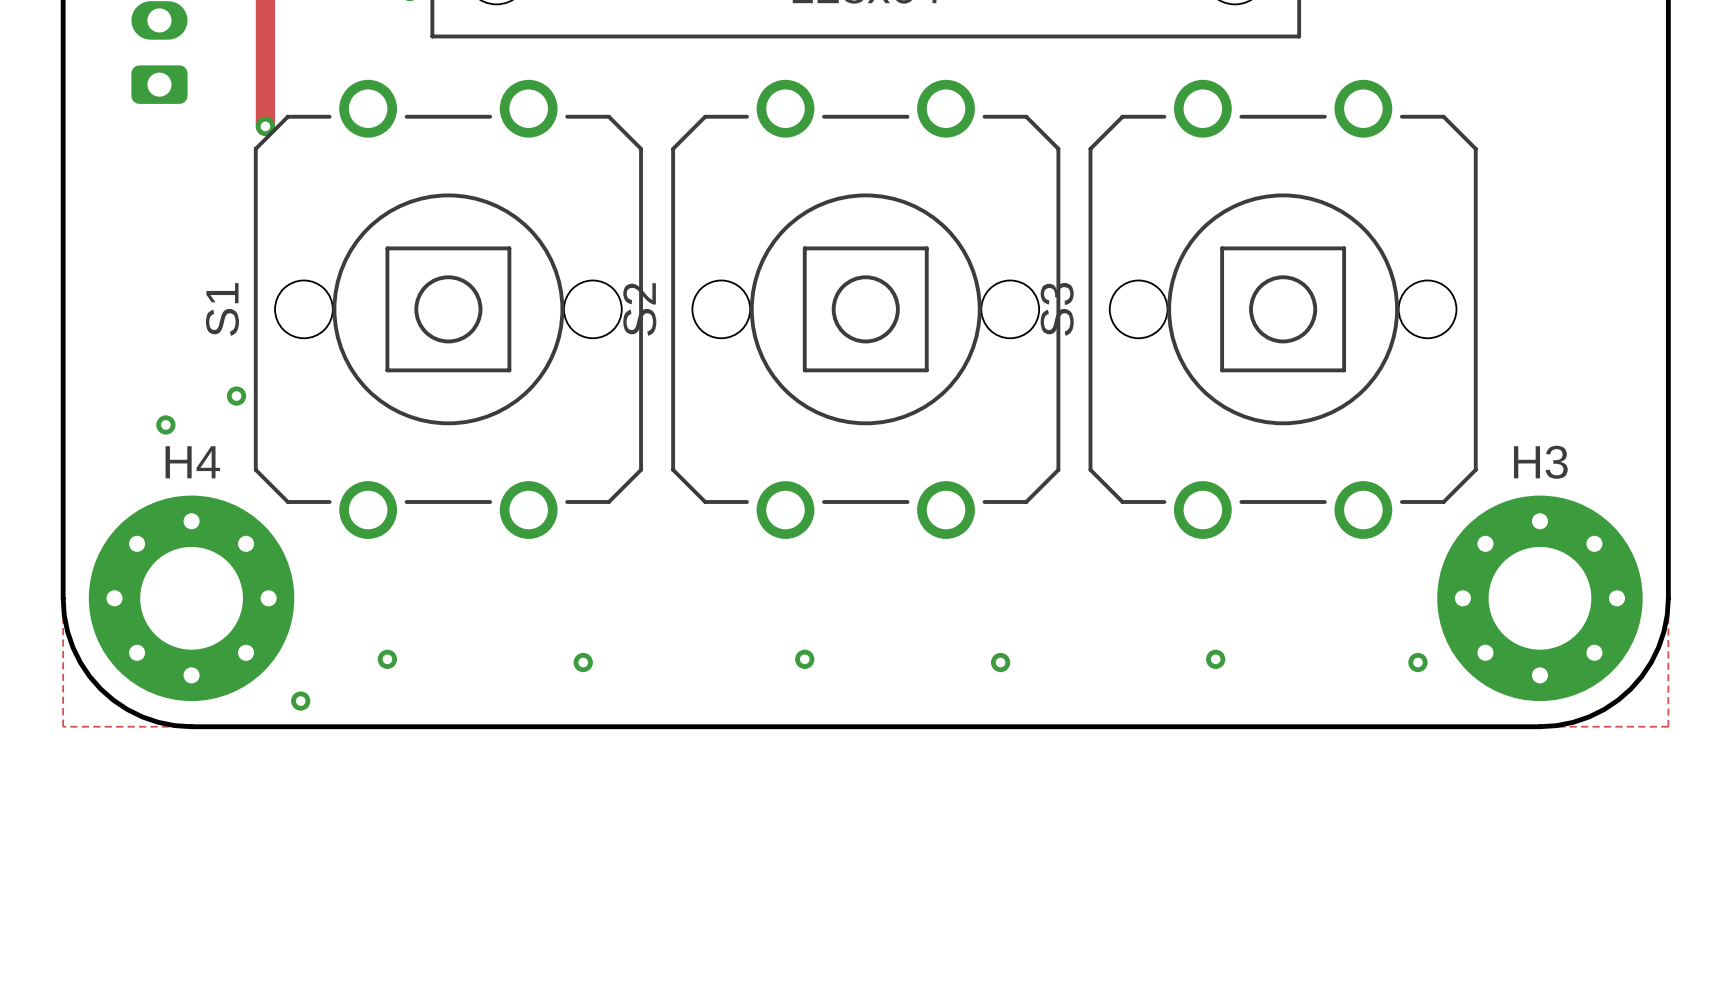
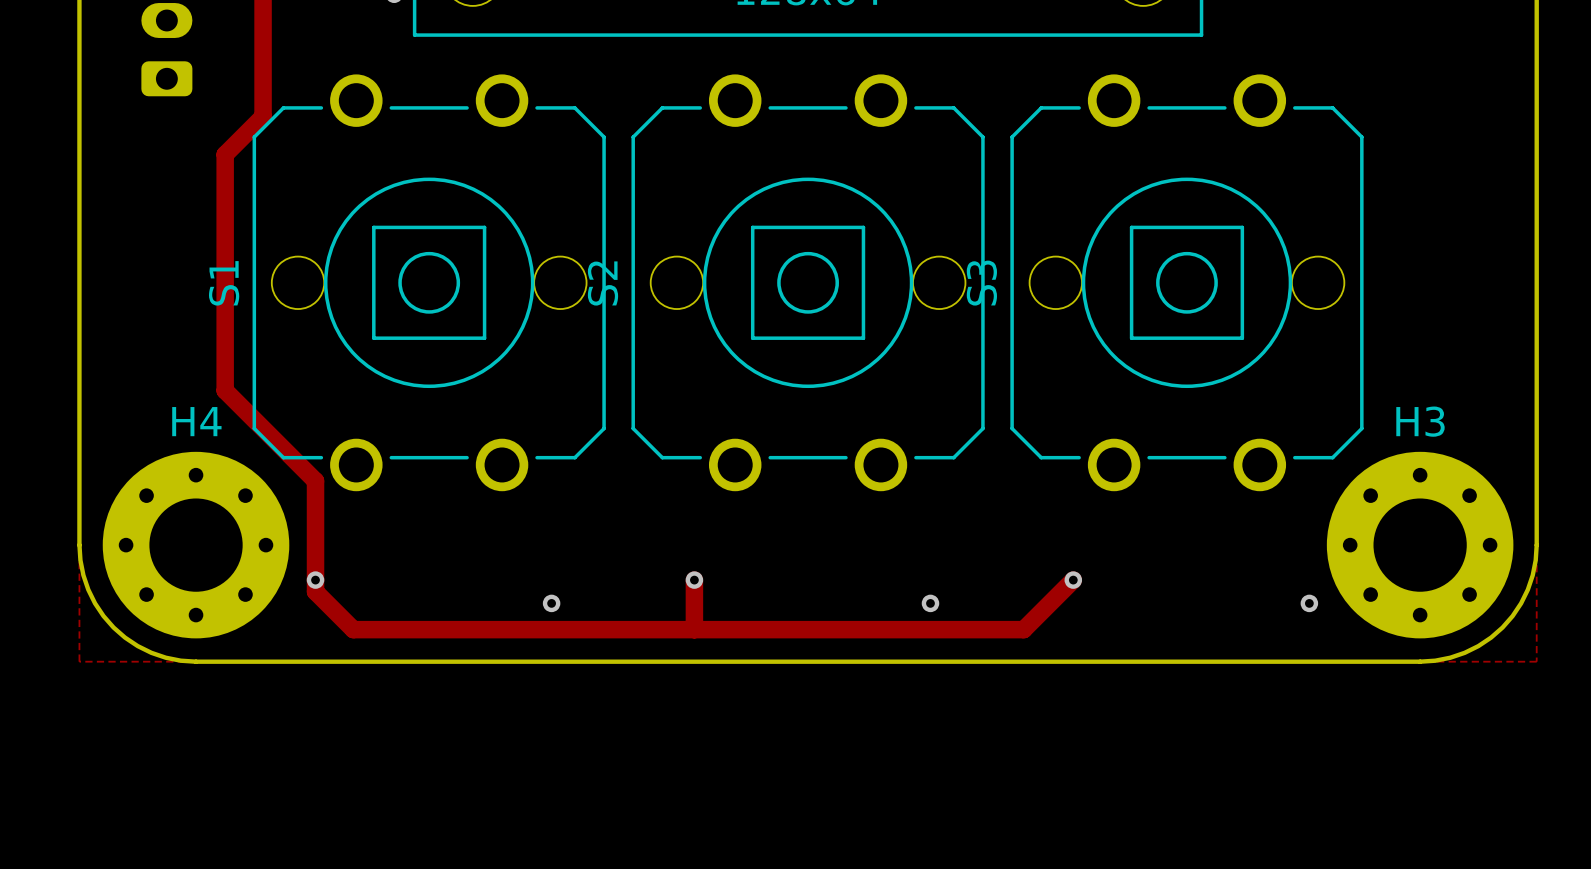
track: none -> (263, 116) (225, 154) (225, 390) (315, 480) (315, 591) (353, 629) (1023, 629) (1073, 580)
via: (265, 126) -> none
via: (236, 396) -> none
via: (165, 424) -> none
via: none -> (315, 580)
track: none -> (694, 580) (694, 629)
via: (387, 659) -> none
via position: (804, 659) -> (694, 580)
via position: (1215, 659) -> (1073, 580)
via: (300, 701) -> none

